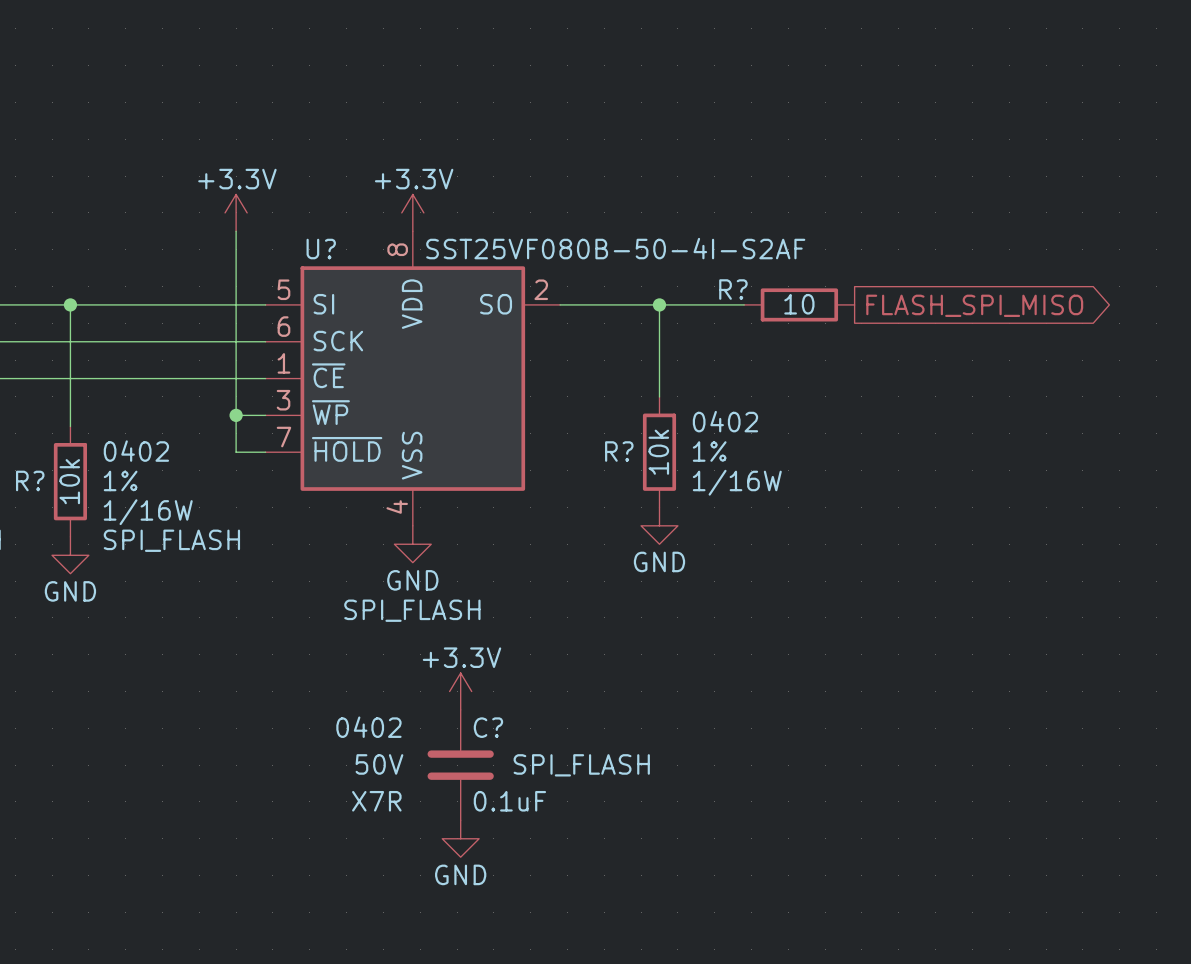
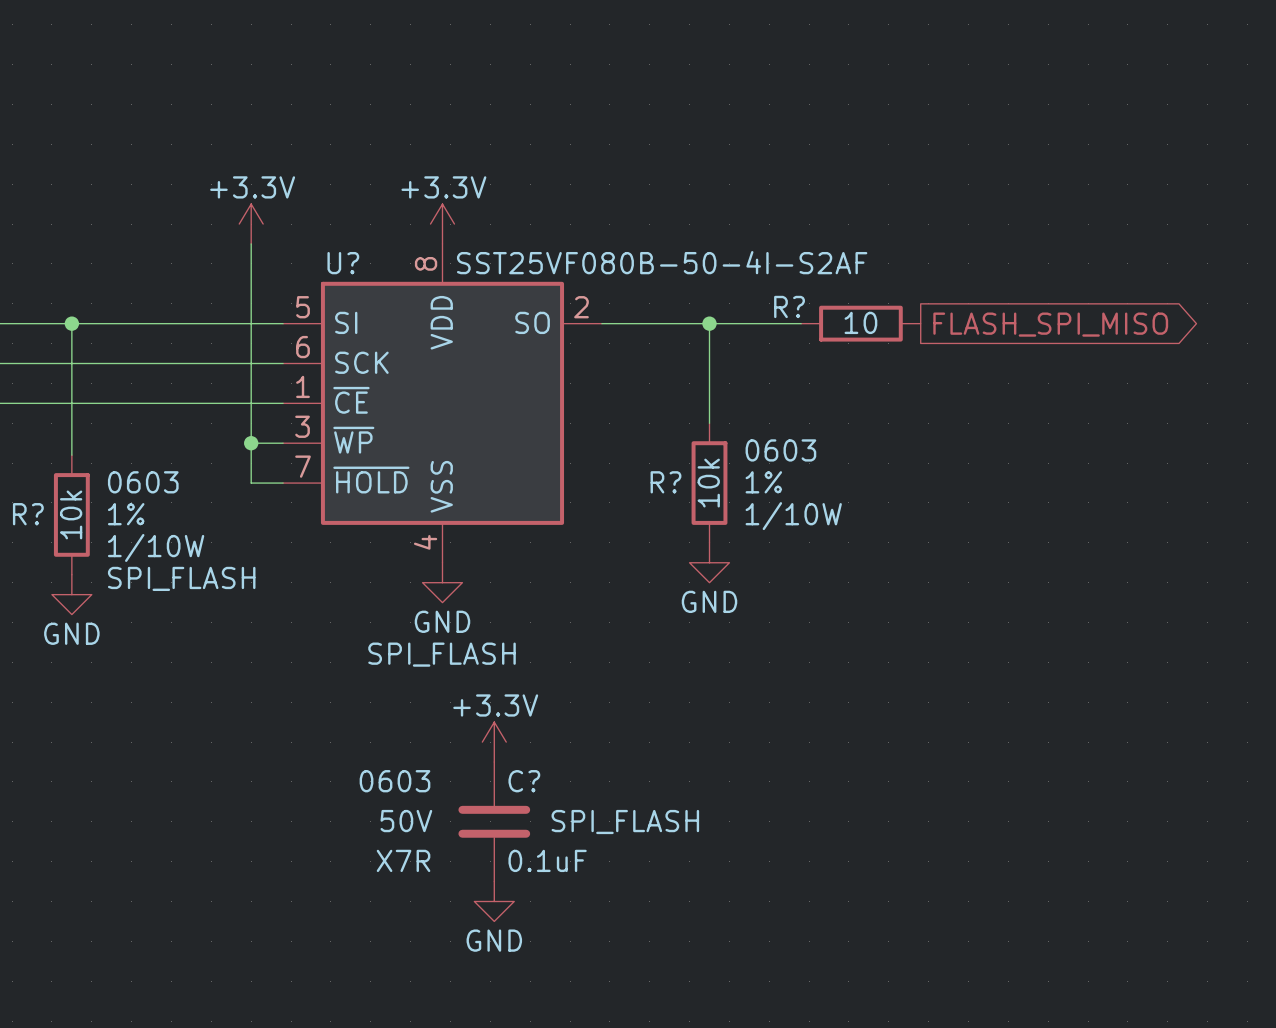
R? text: 0402 (725, 421) -> 0603 (780, 450)
R? text: 0402 (136, 451) -> 0603 (143, 482)
R? text: 1/16W (737, 482) -> 1/10W (793, 516)
R? text: 1/16W (148, 512) -> 1/10W (156, 547)
C? text: 0402 (368, 727) -> 0603 (394, 781)

